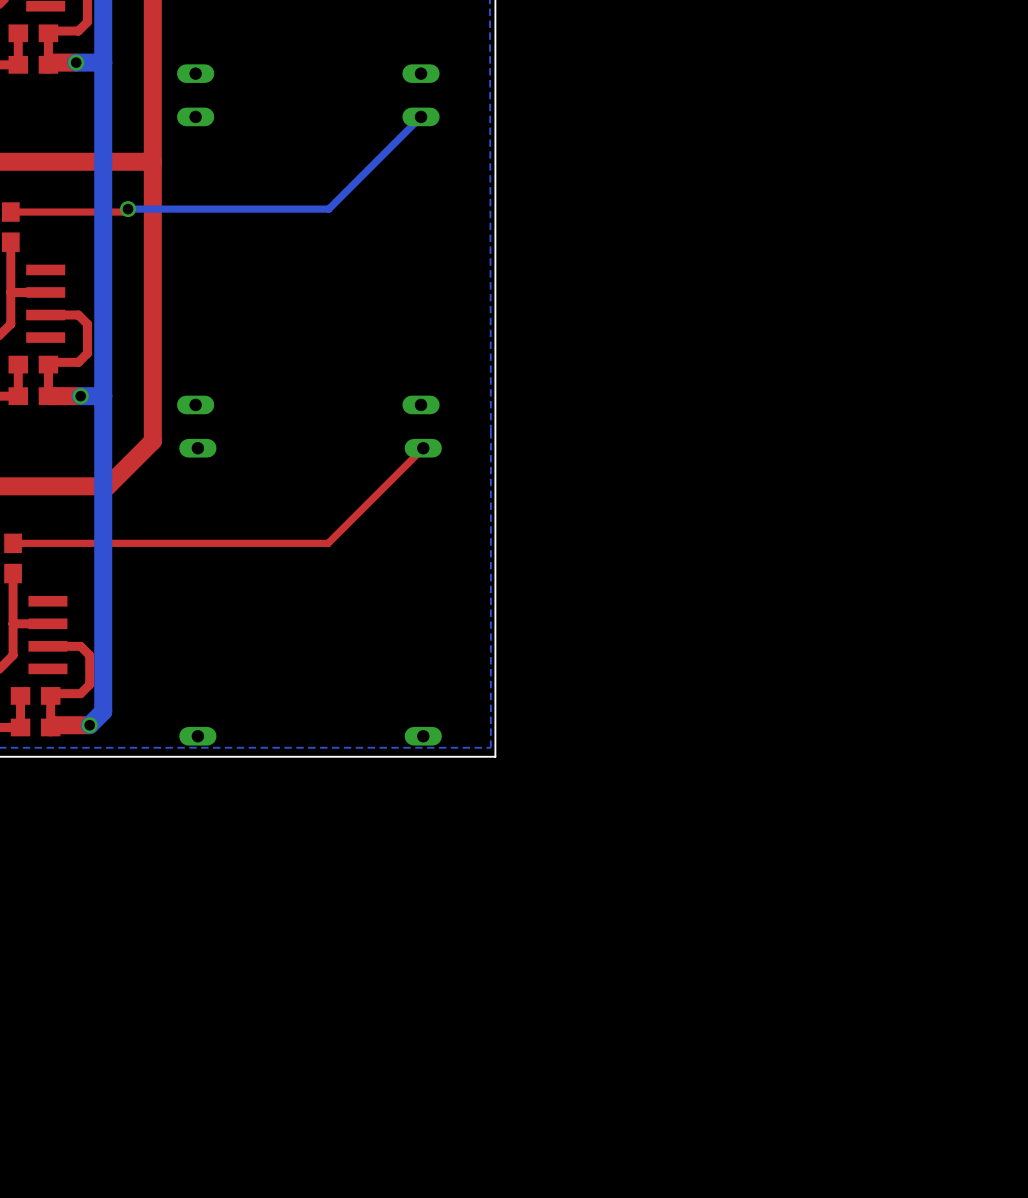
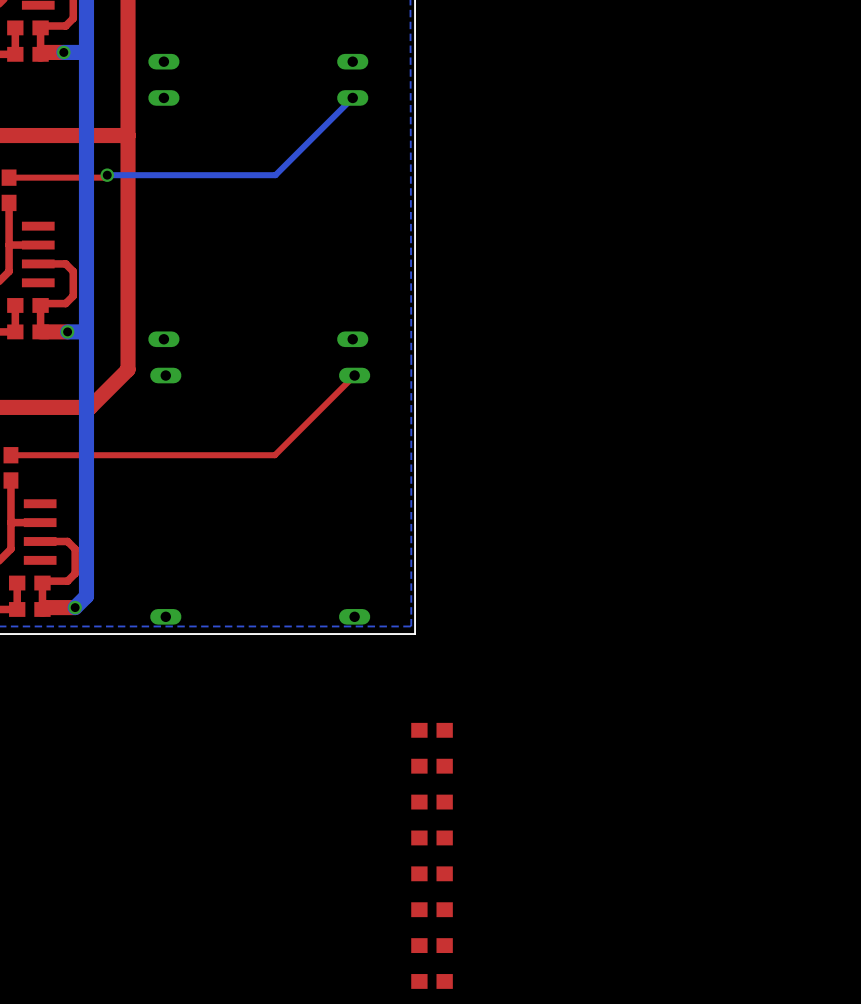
part: none -> (432, 730)
part: none -> (432, 766)
part: none -> (432, 802)
part: none -> (432, 837)
part: none -> (432, 873)
part: none -> (432, 909)
part: none -> (432, 945)
part: none -> (432, 981)

